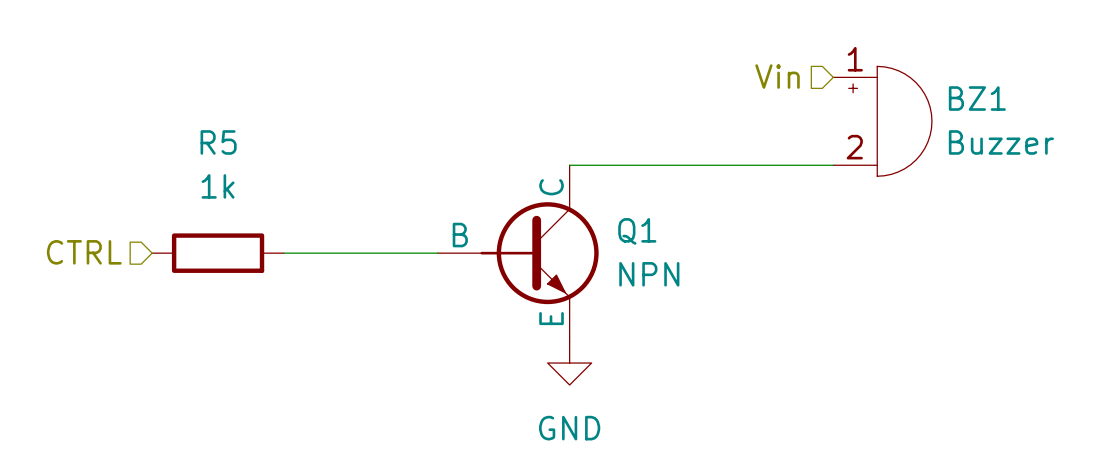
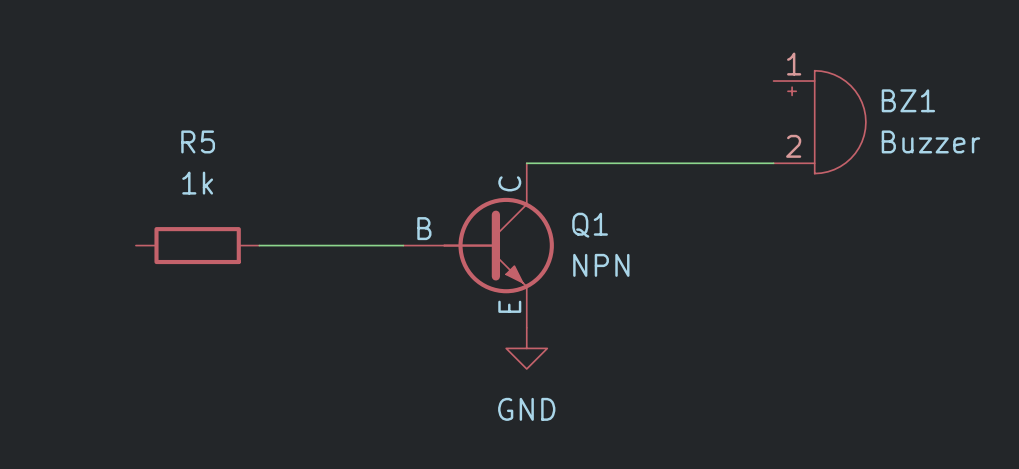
hierarchical label: Vin (777, 76) -> none
hierarchical label: CTRL (84, 252) -> none

